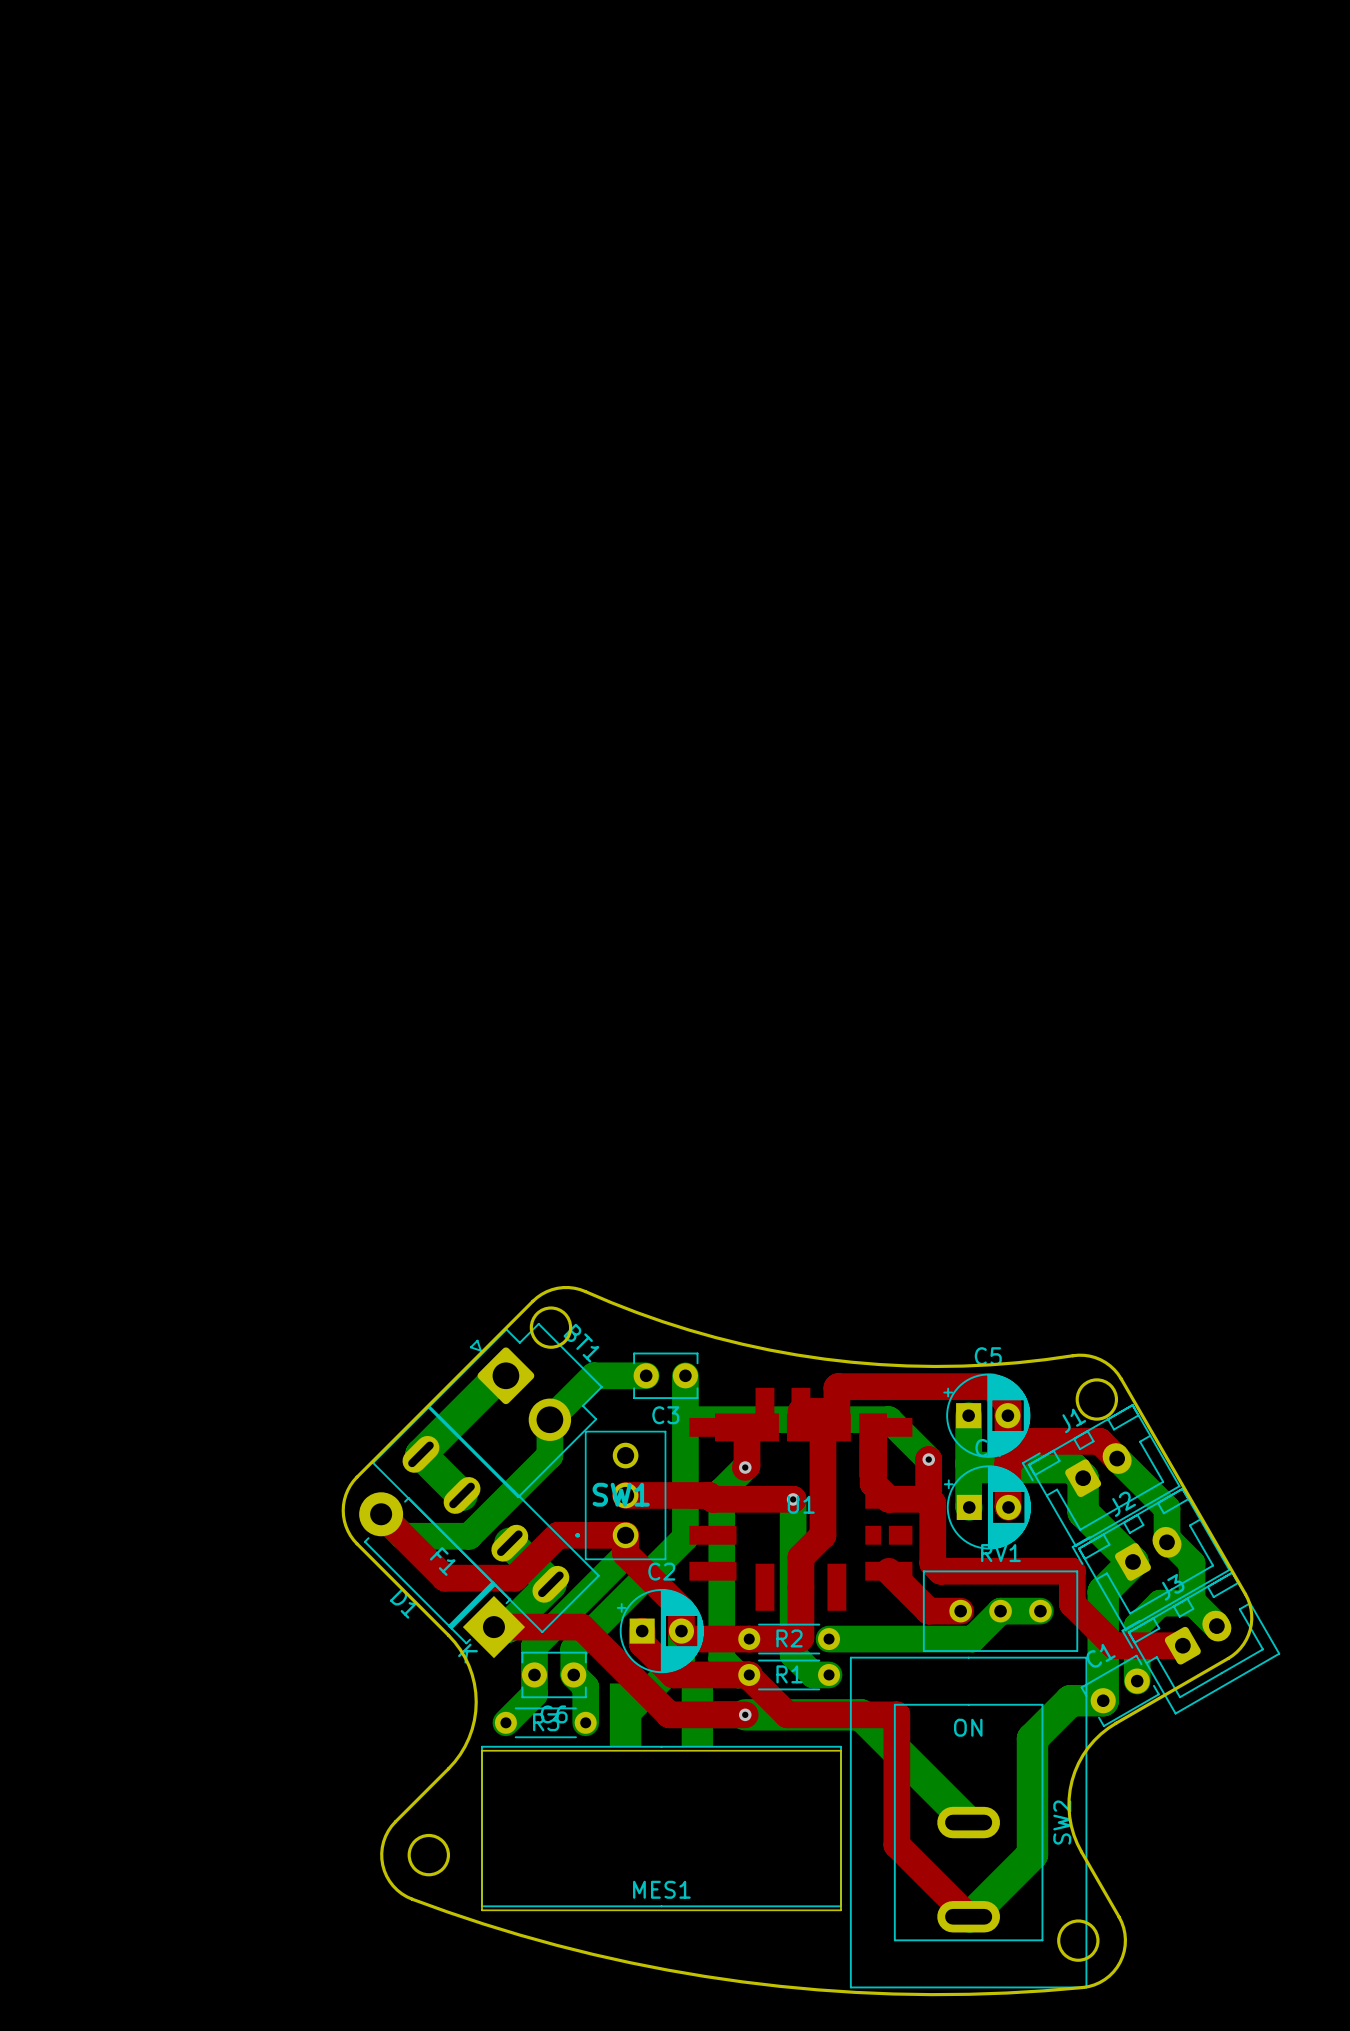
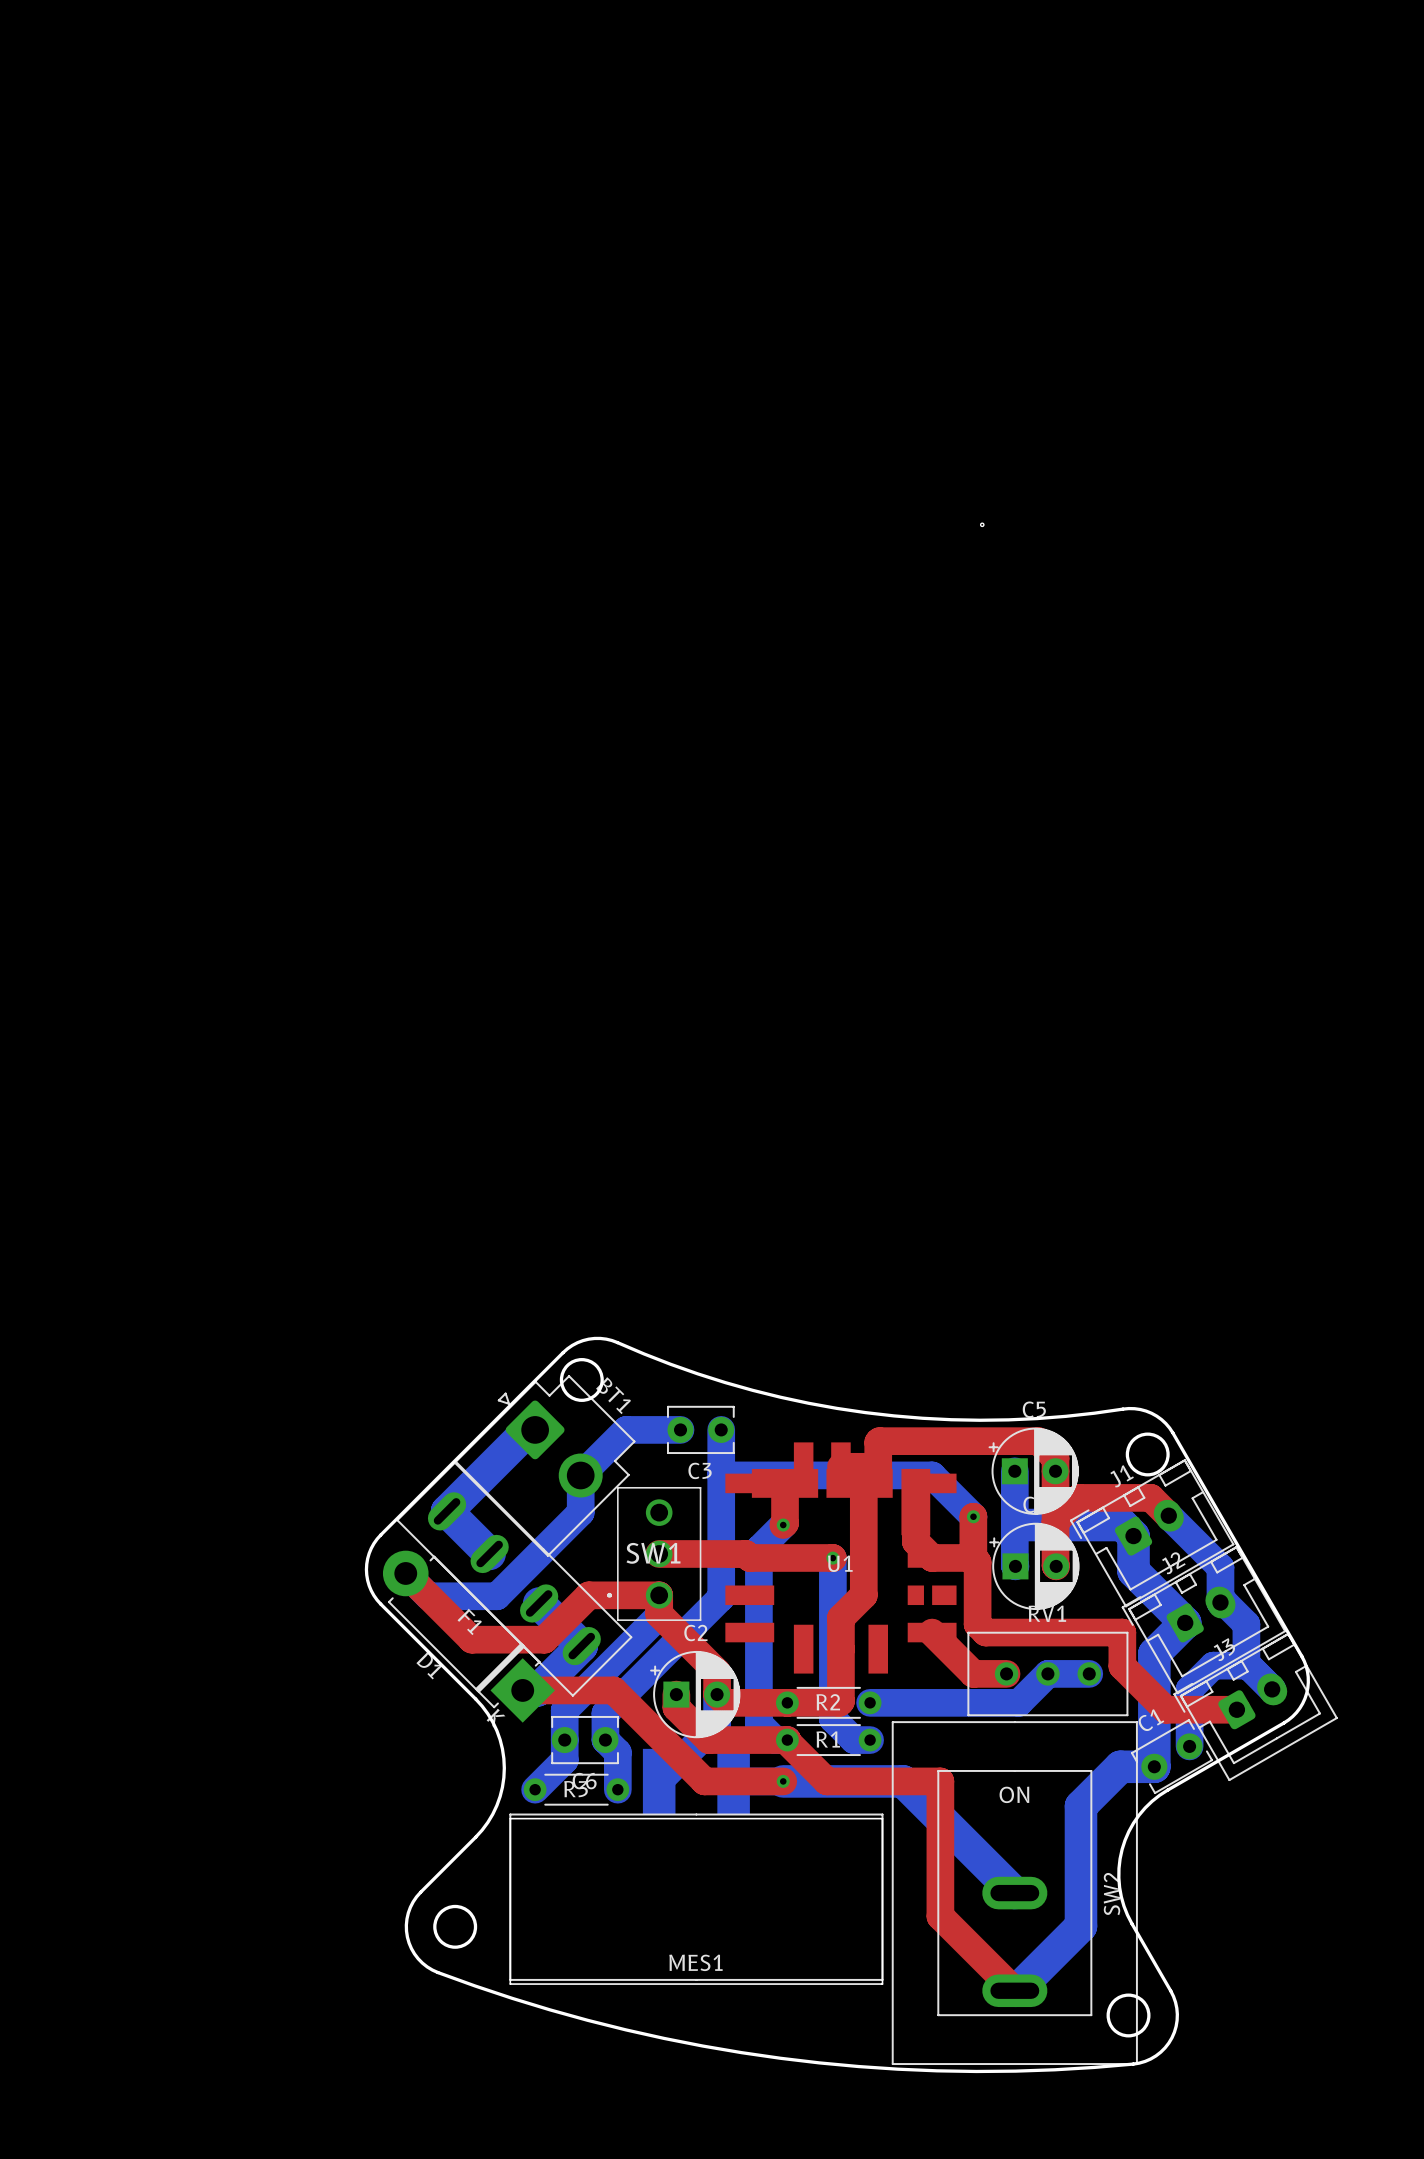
round board edge: none -> [980, 523, 984, 527]

